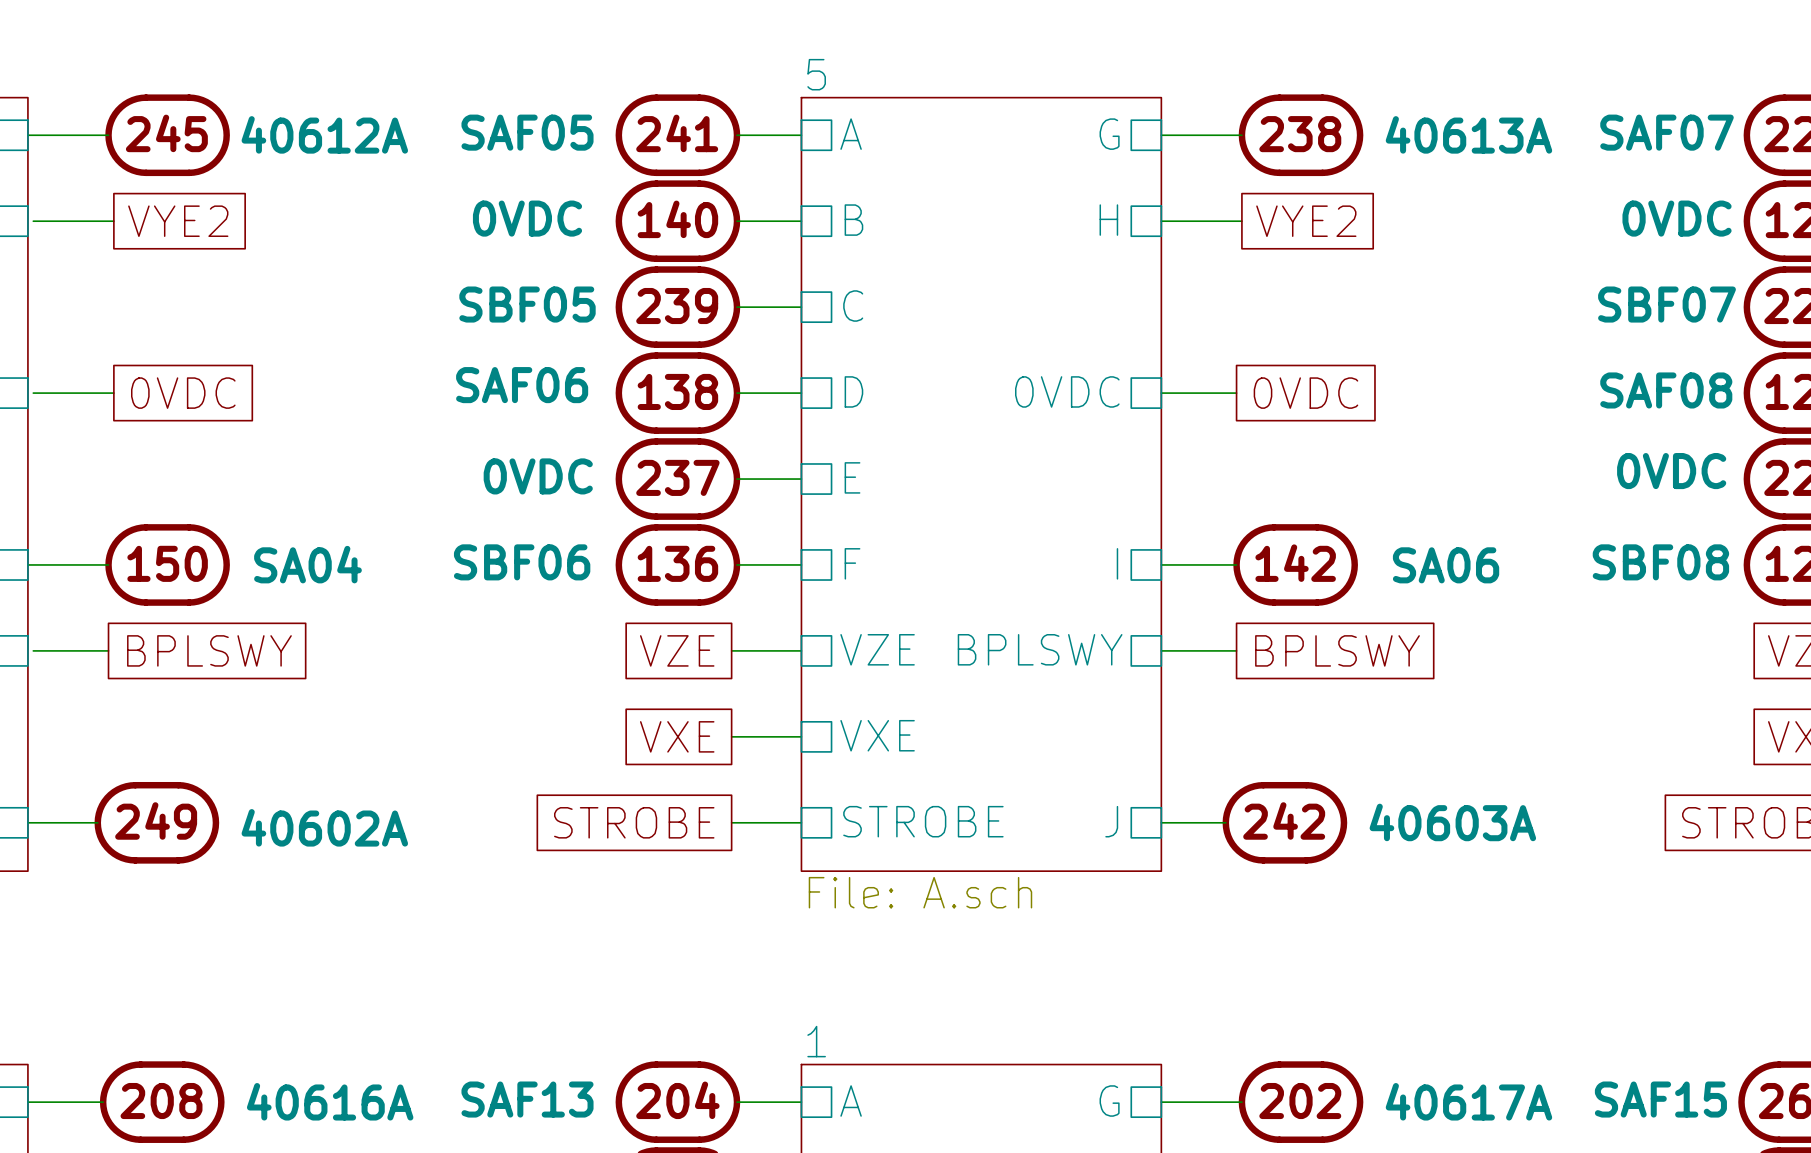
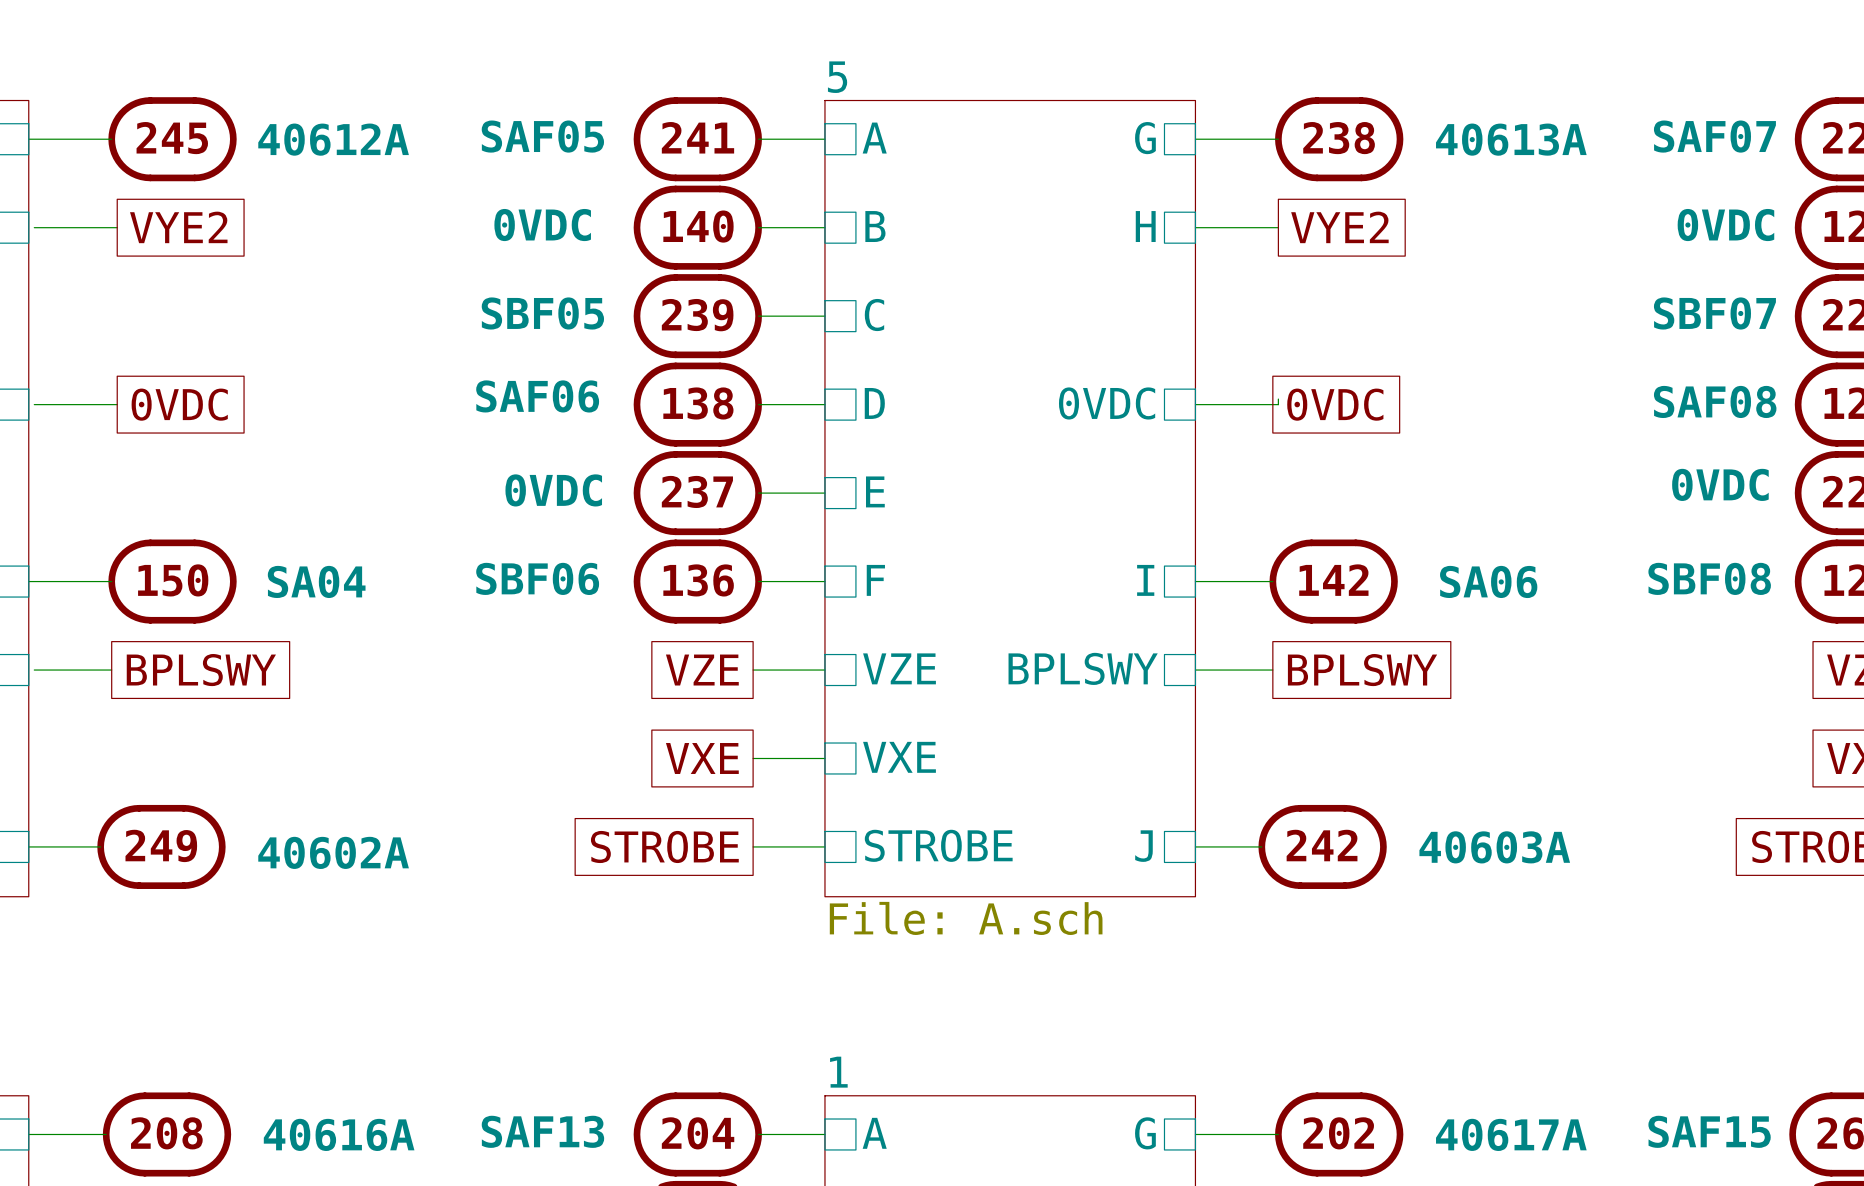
wire: none -> (1278, 399) (1278, 404) (1272, 404)

